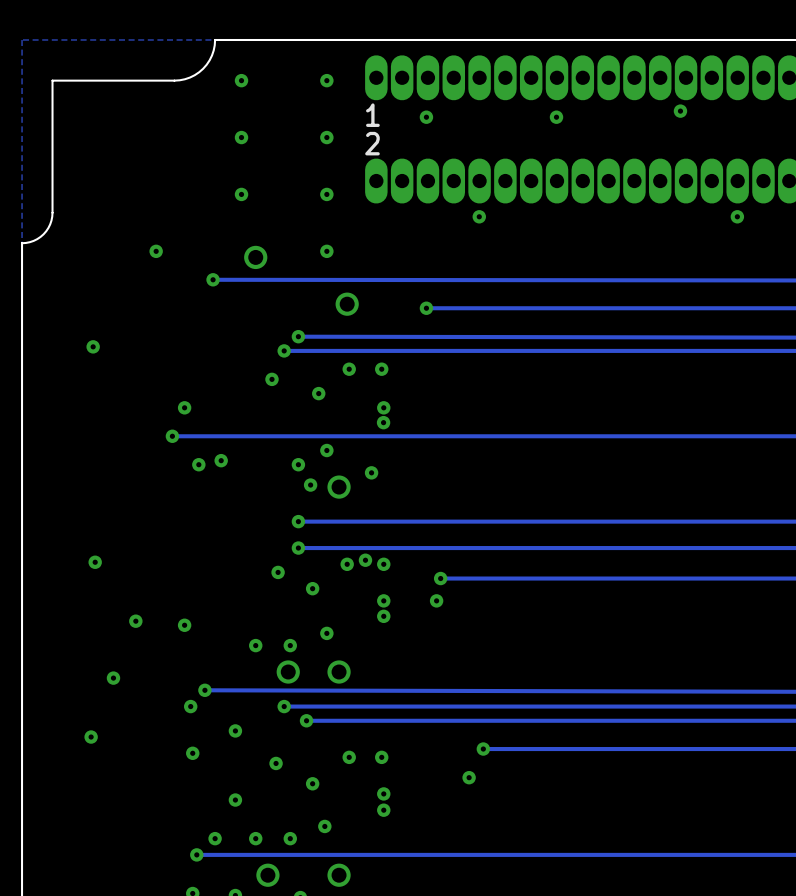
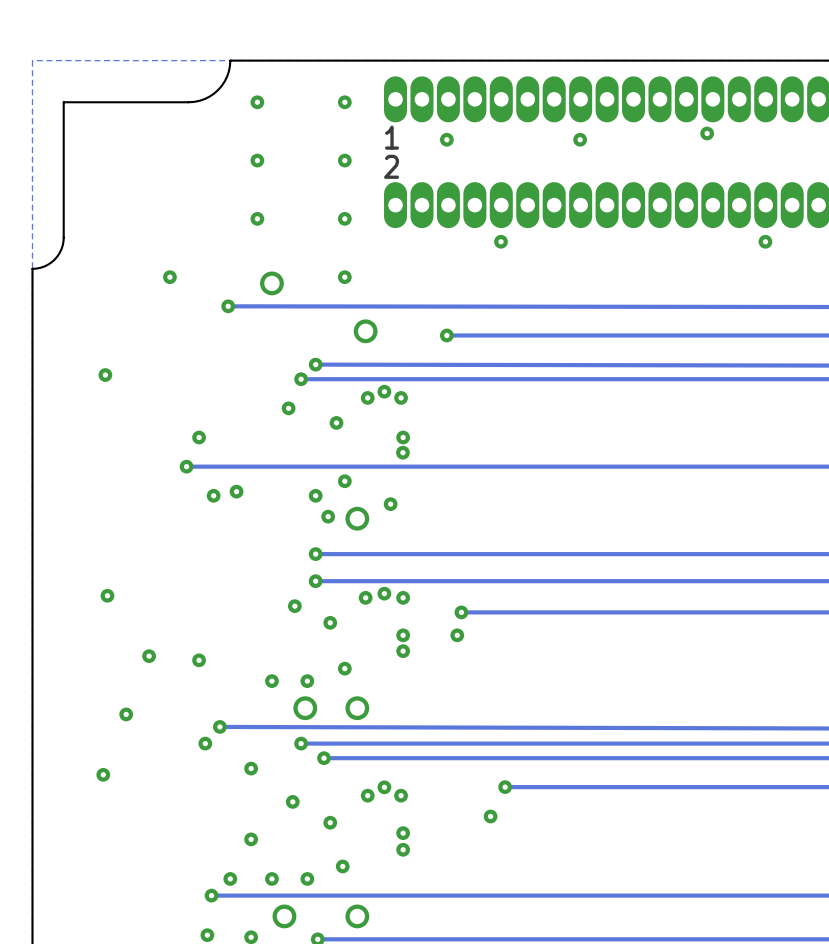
via: none -> (384, 391)
via: none -> (384, 787)
via: (192, 753) -> none

